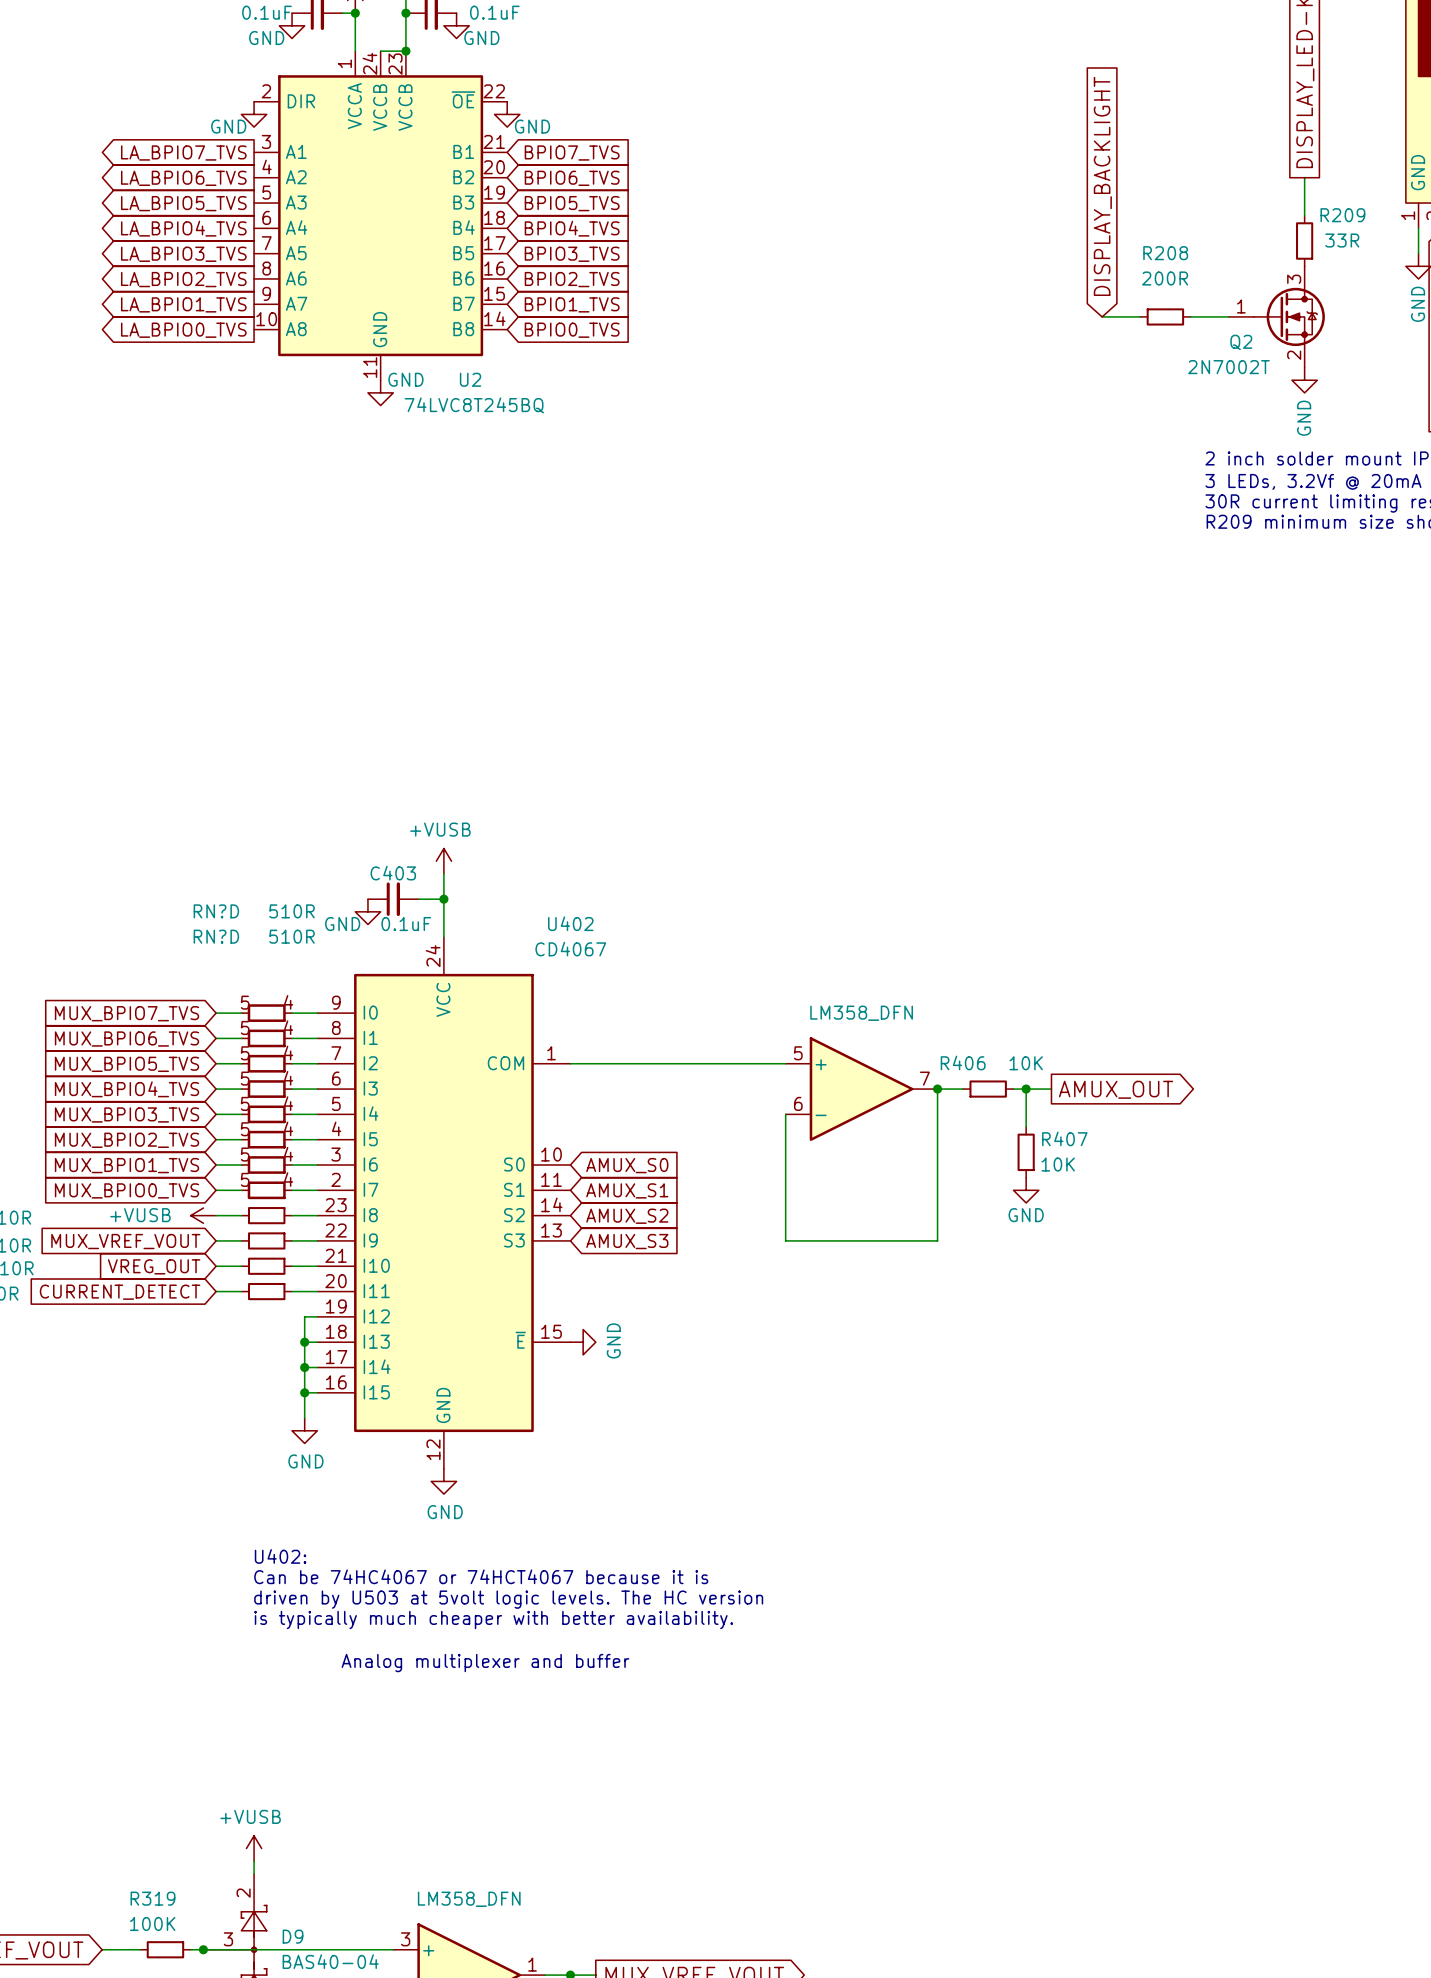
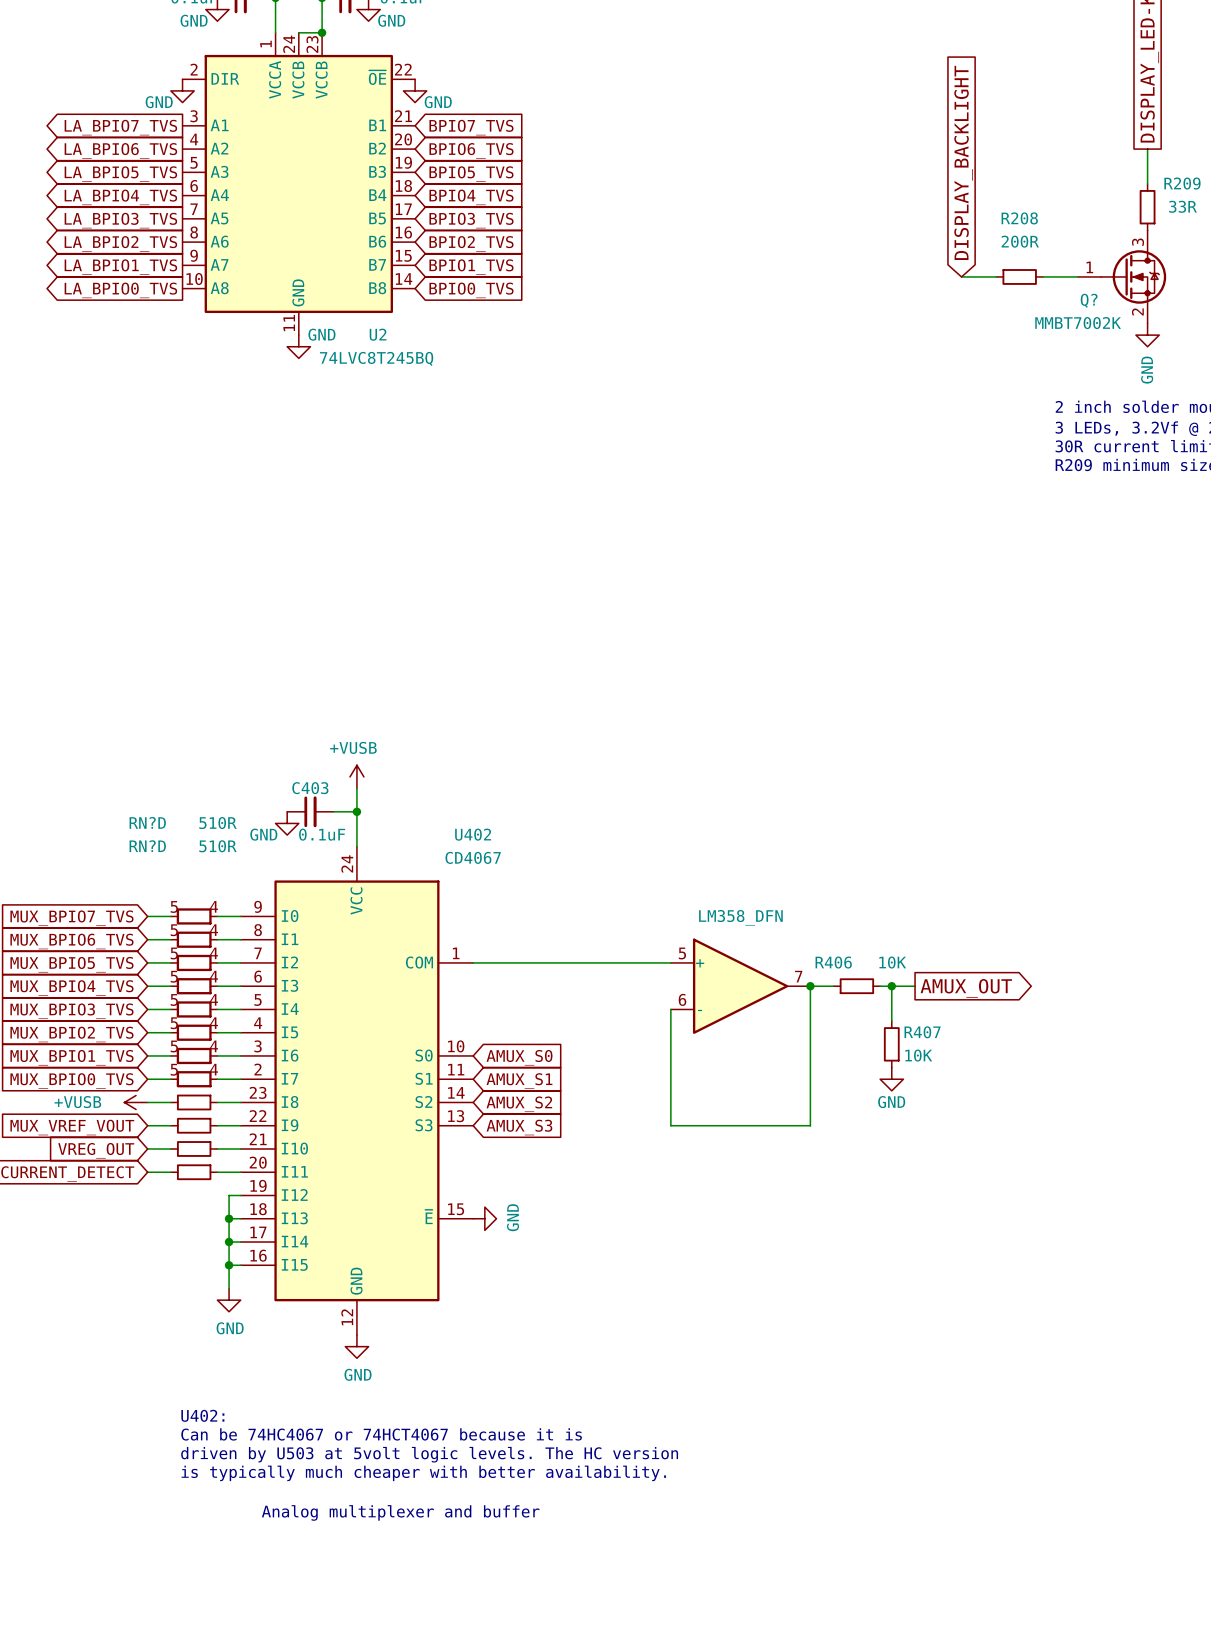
Q2 name: Q2 (1241, 342) -> Q? (1089, 300)
Q2 value: 2N7002T (1228, 367) -> MMBT7002K (1078, 323)

